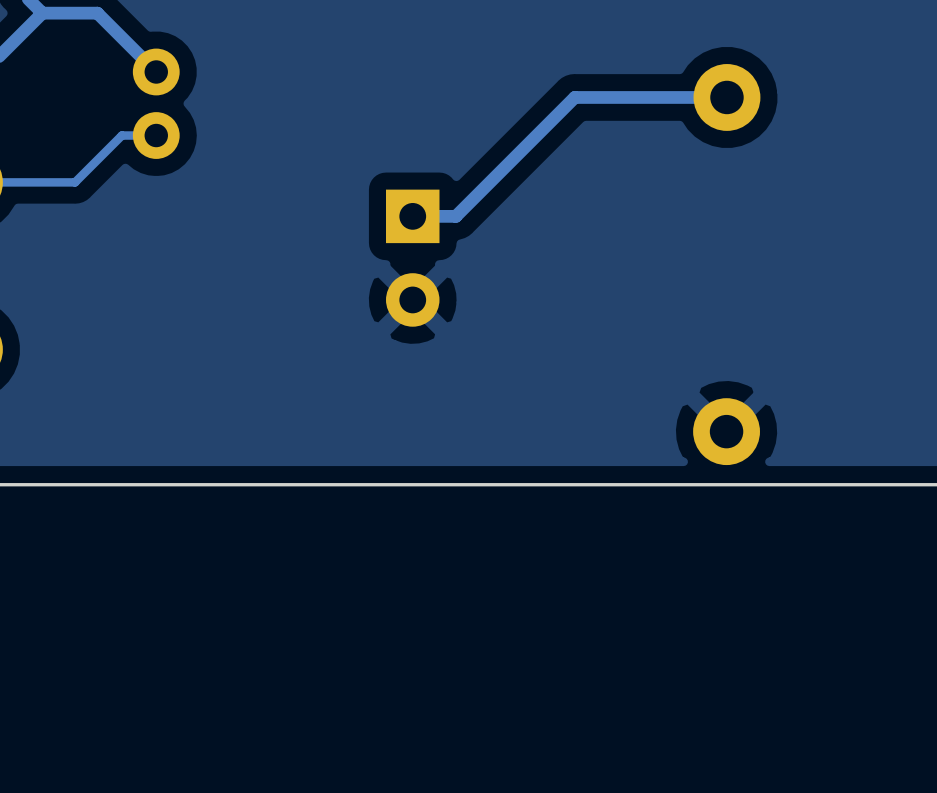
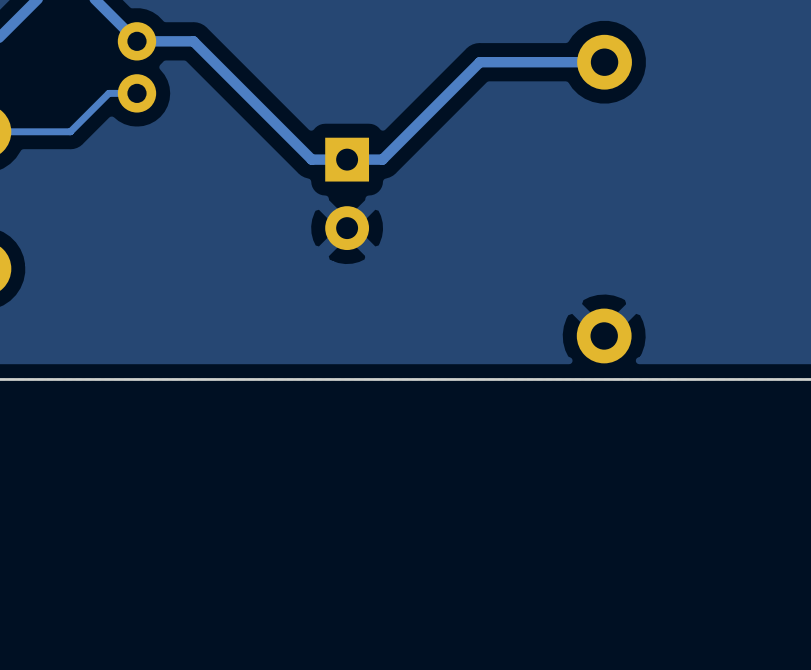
track: none -> (136, 41) (193, 41) (311, 159) (347, 159)

